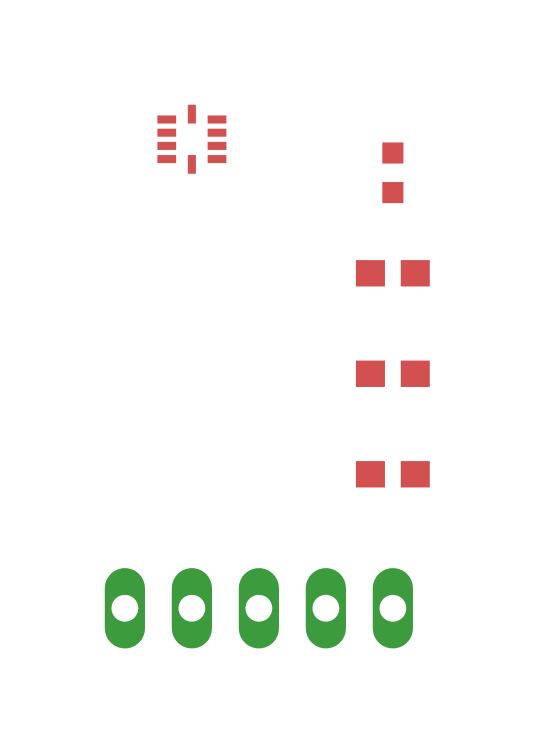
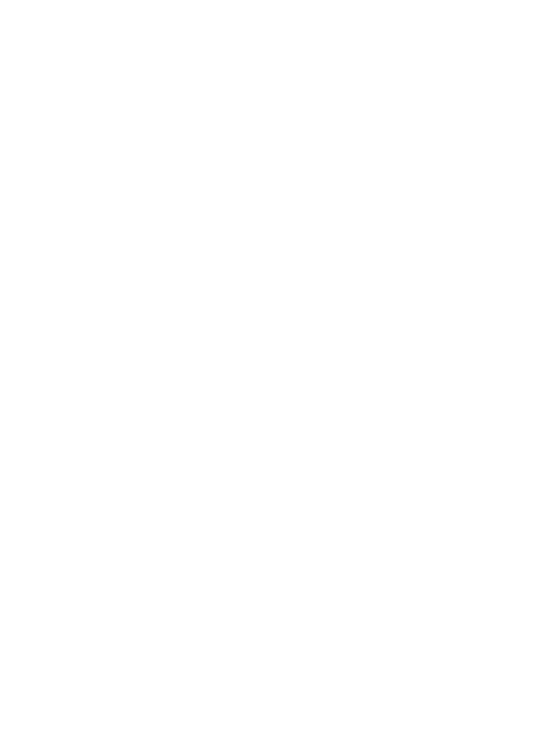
part: (191, 139) -> none
part: (392, 172) -> none
part: (392, 273) -> none
part: (392, 373) -> none
part: (392, 474) -> none
part: (258, 608) -> none

